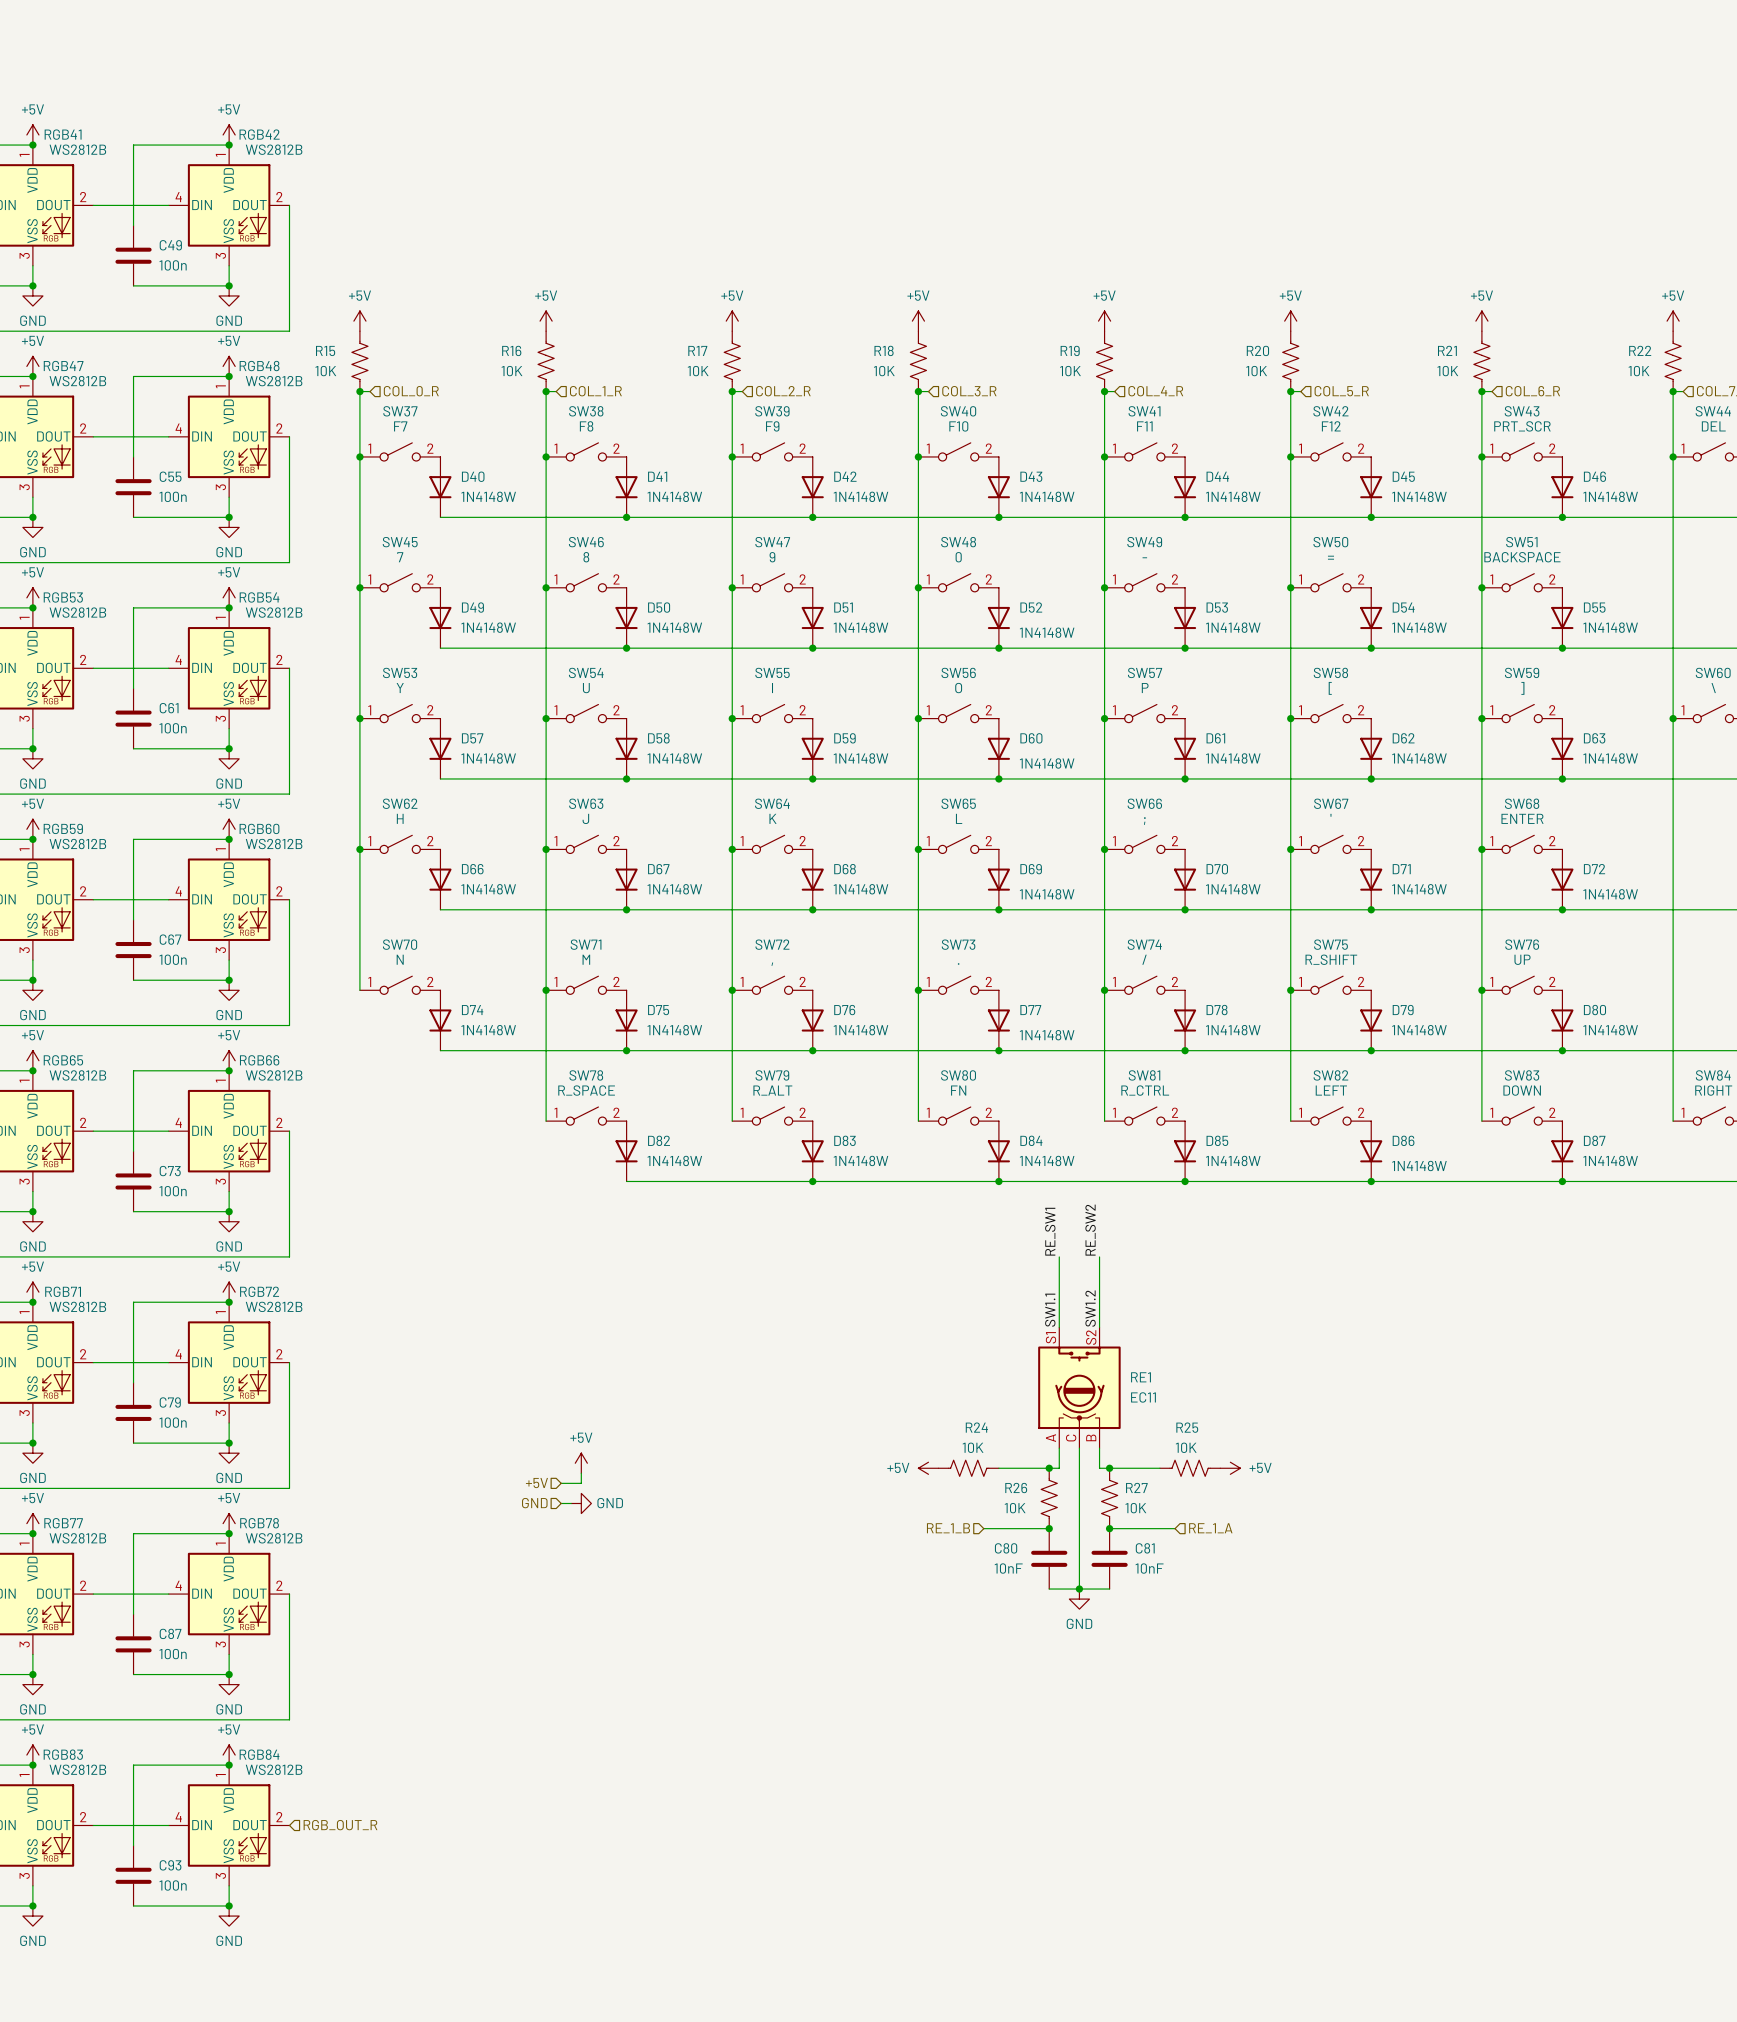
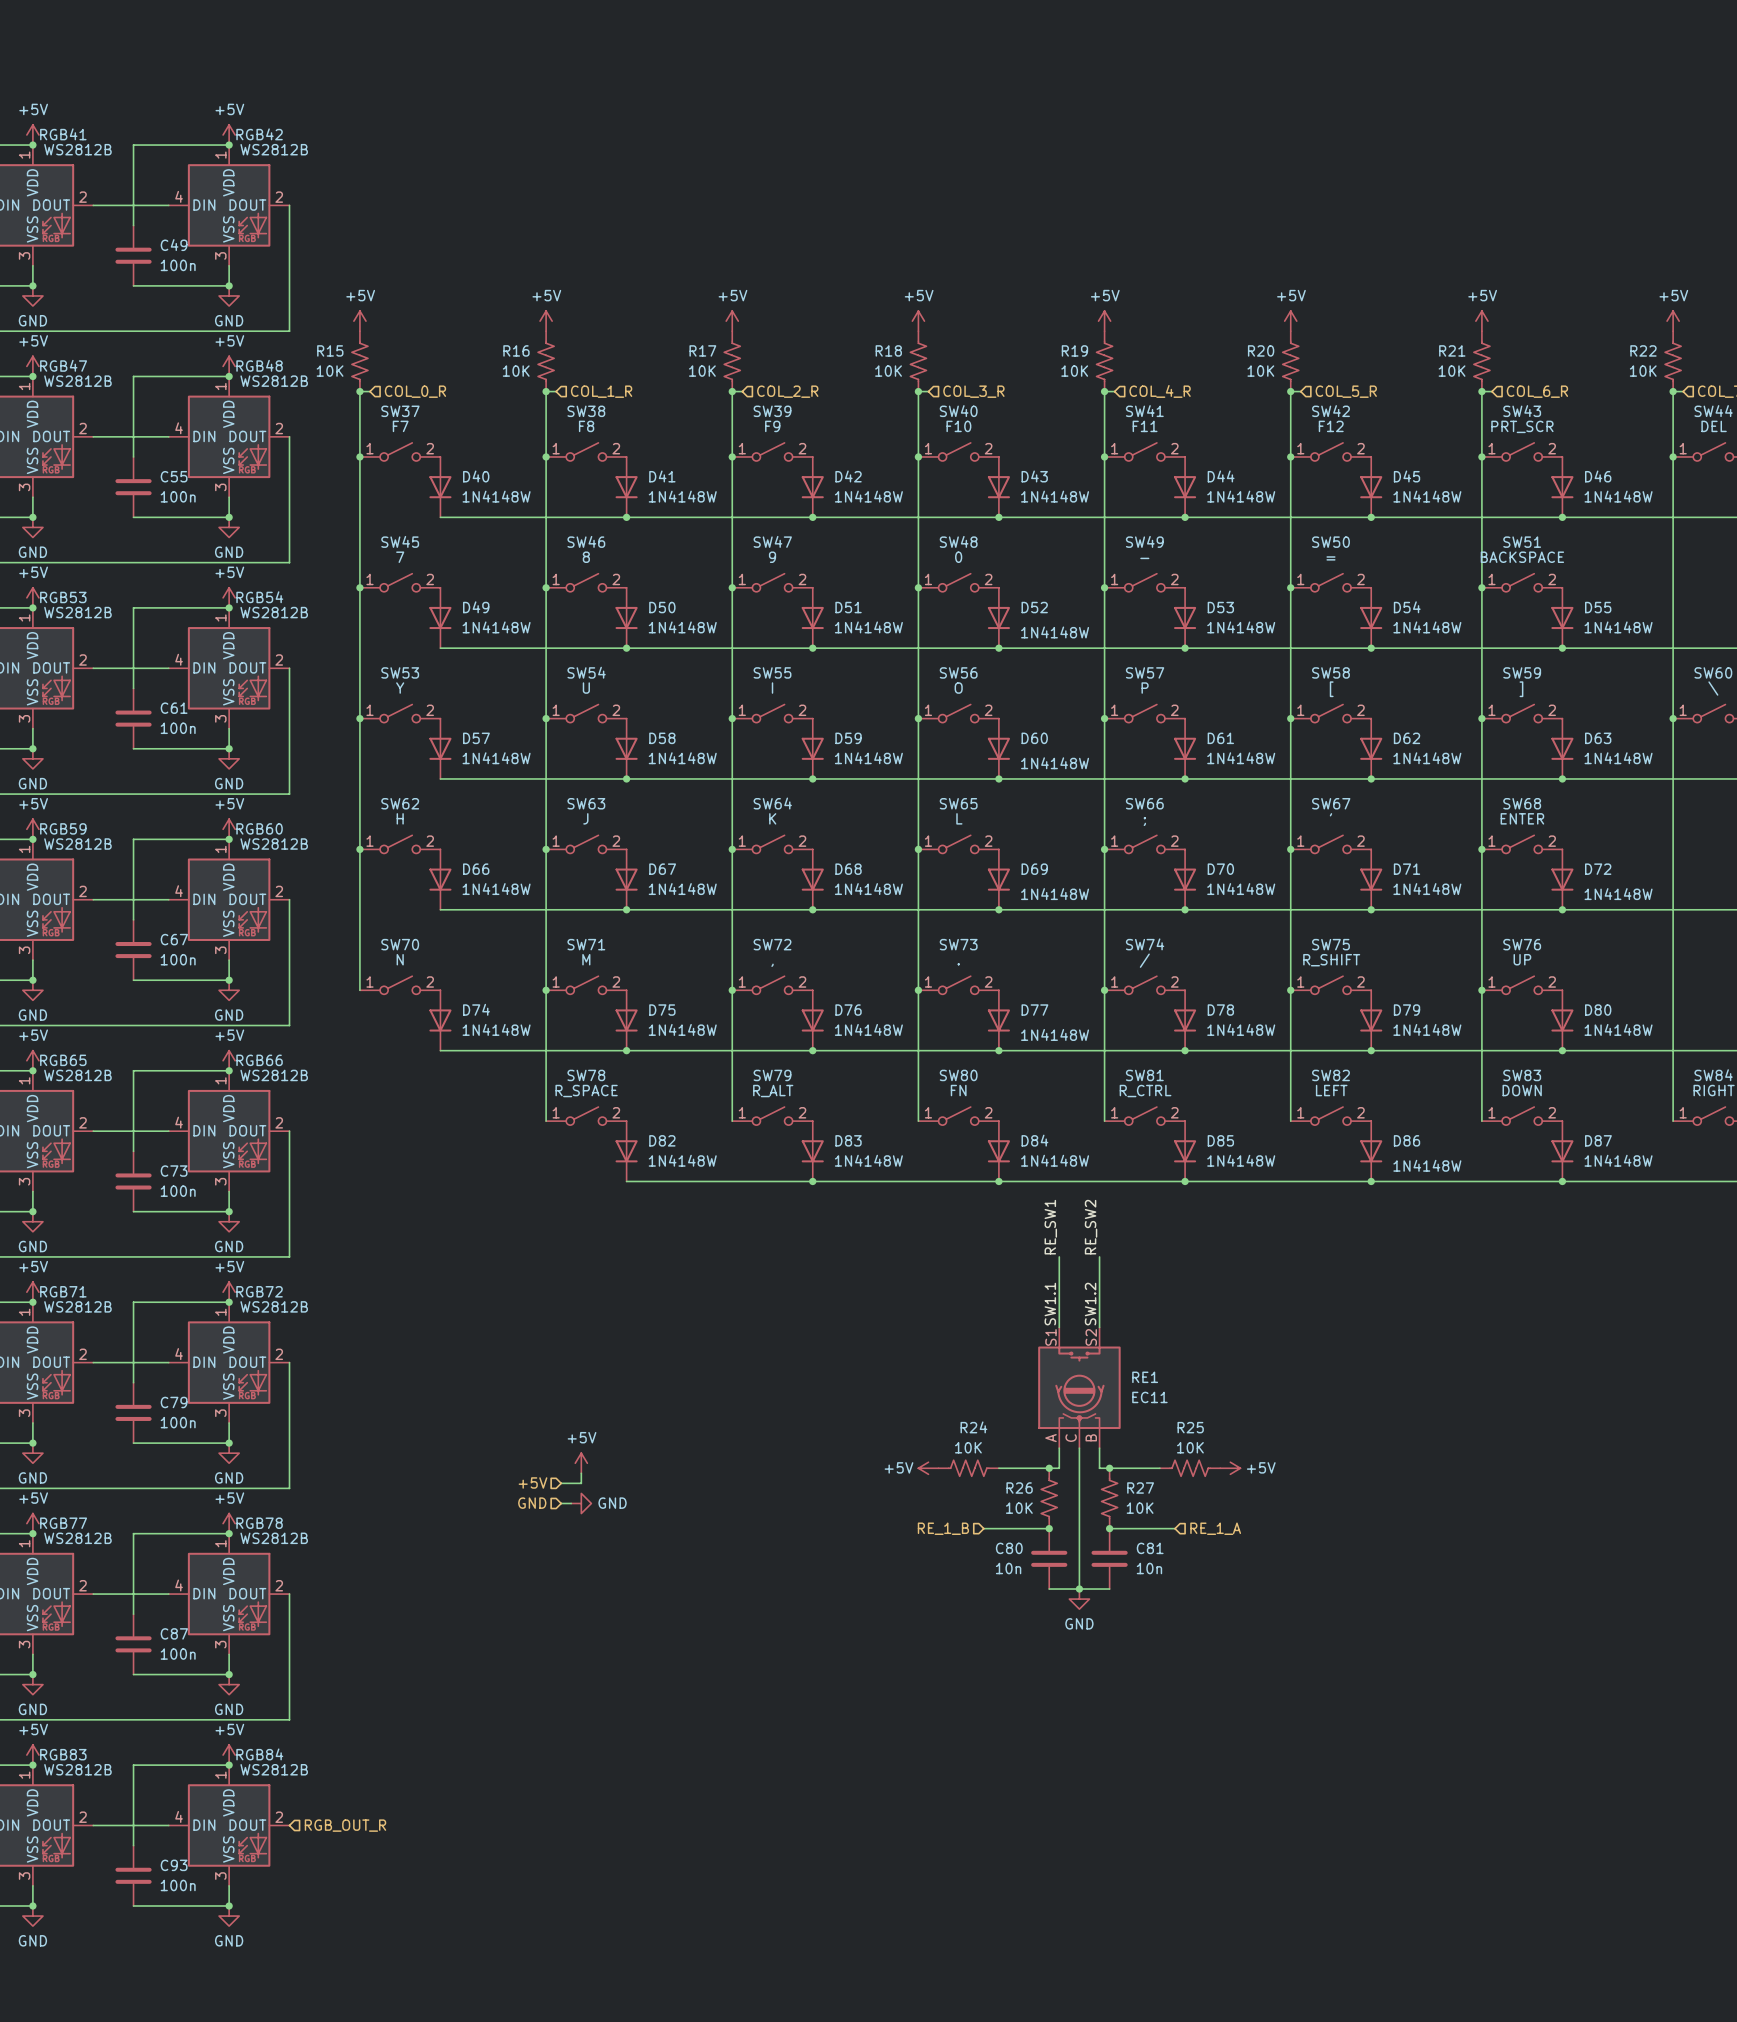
C80 value: 10nF (1008, 1568) -> 10n (1008, 1568)
C81 value: 10nF (1149, 1568) -> 10n (1149, 1568)

